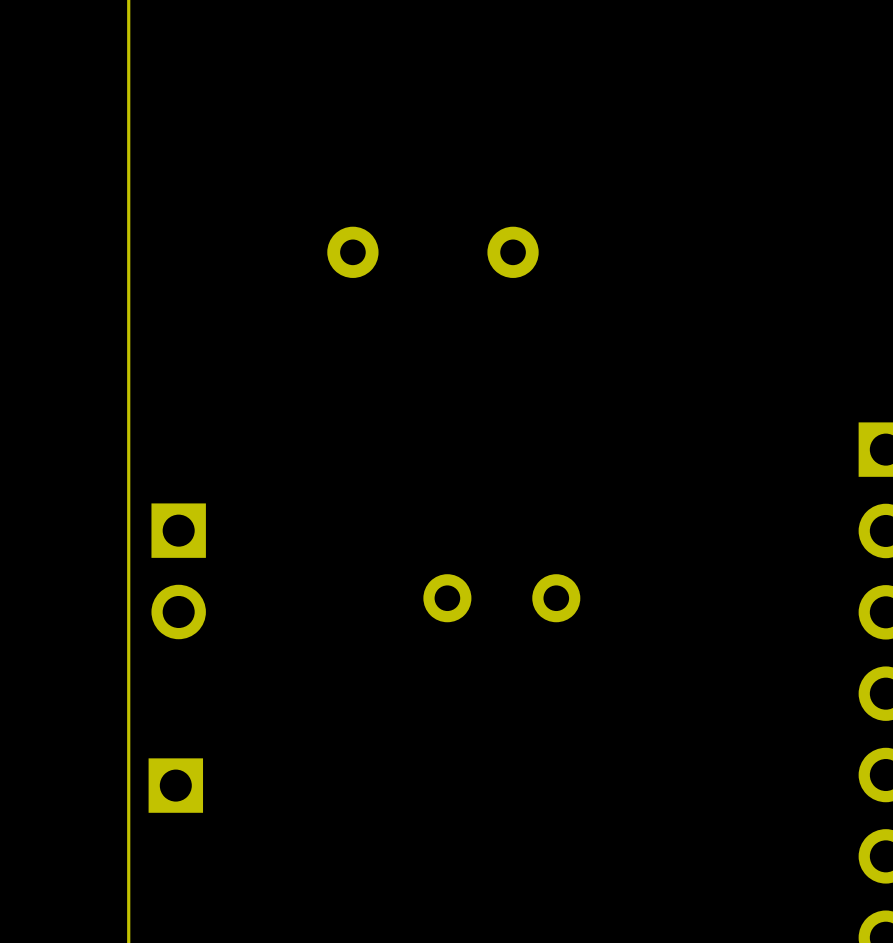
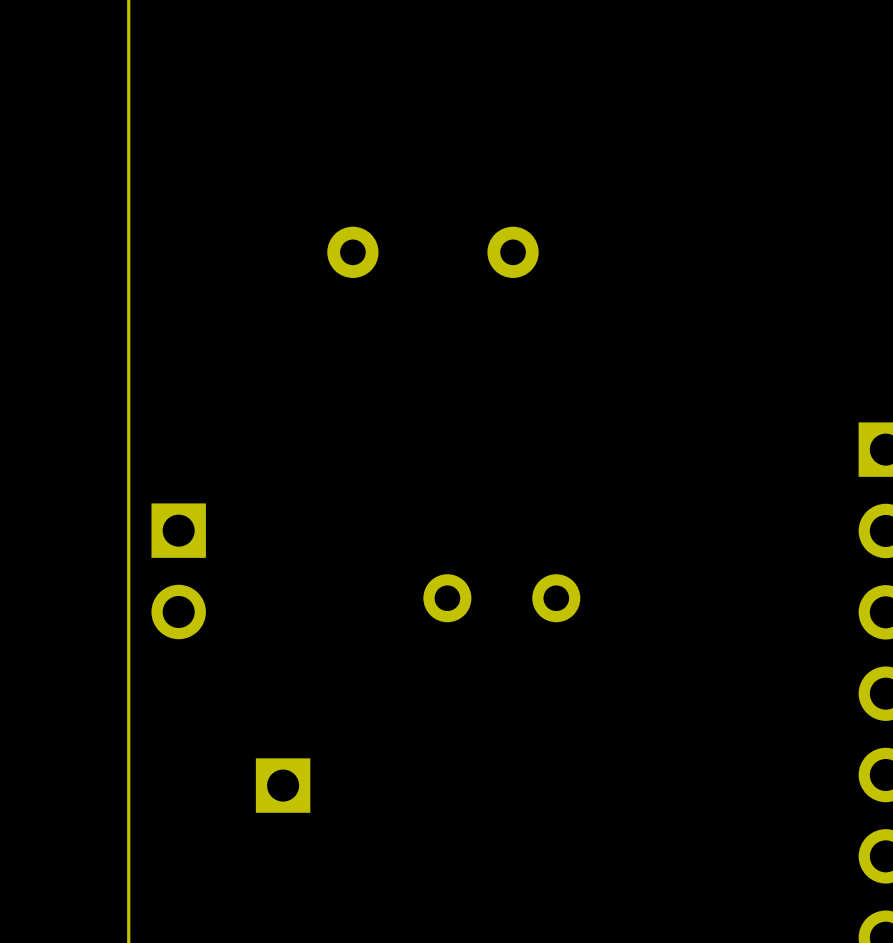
part position: (175, 785) -> (283, 785)

